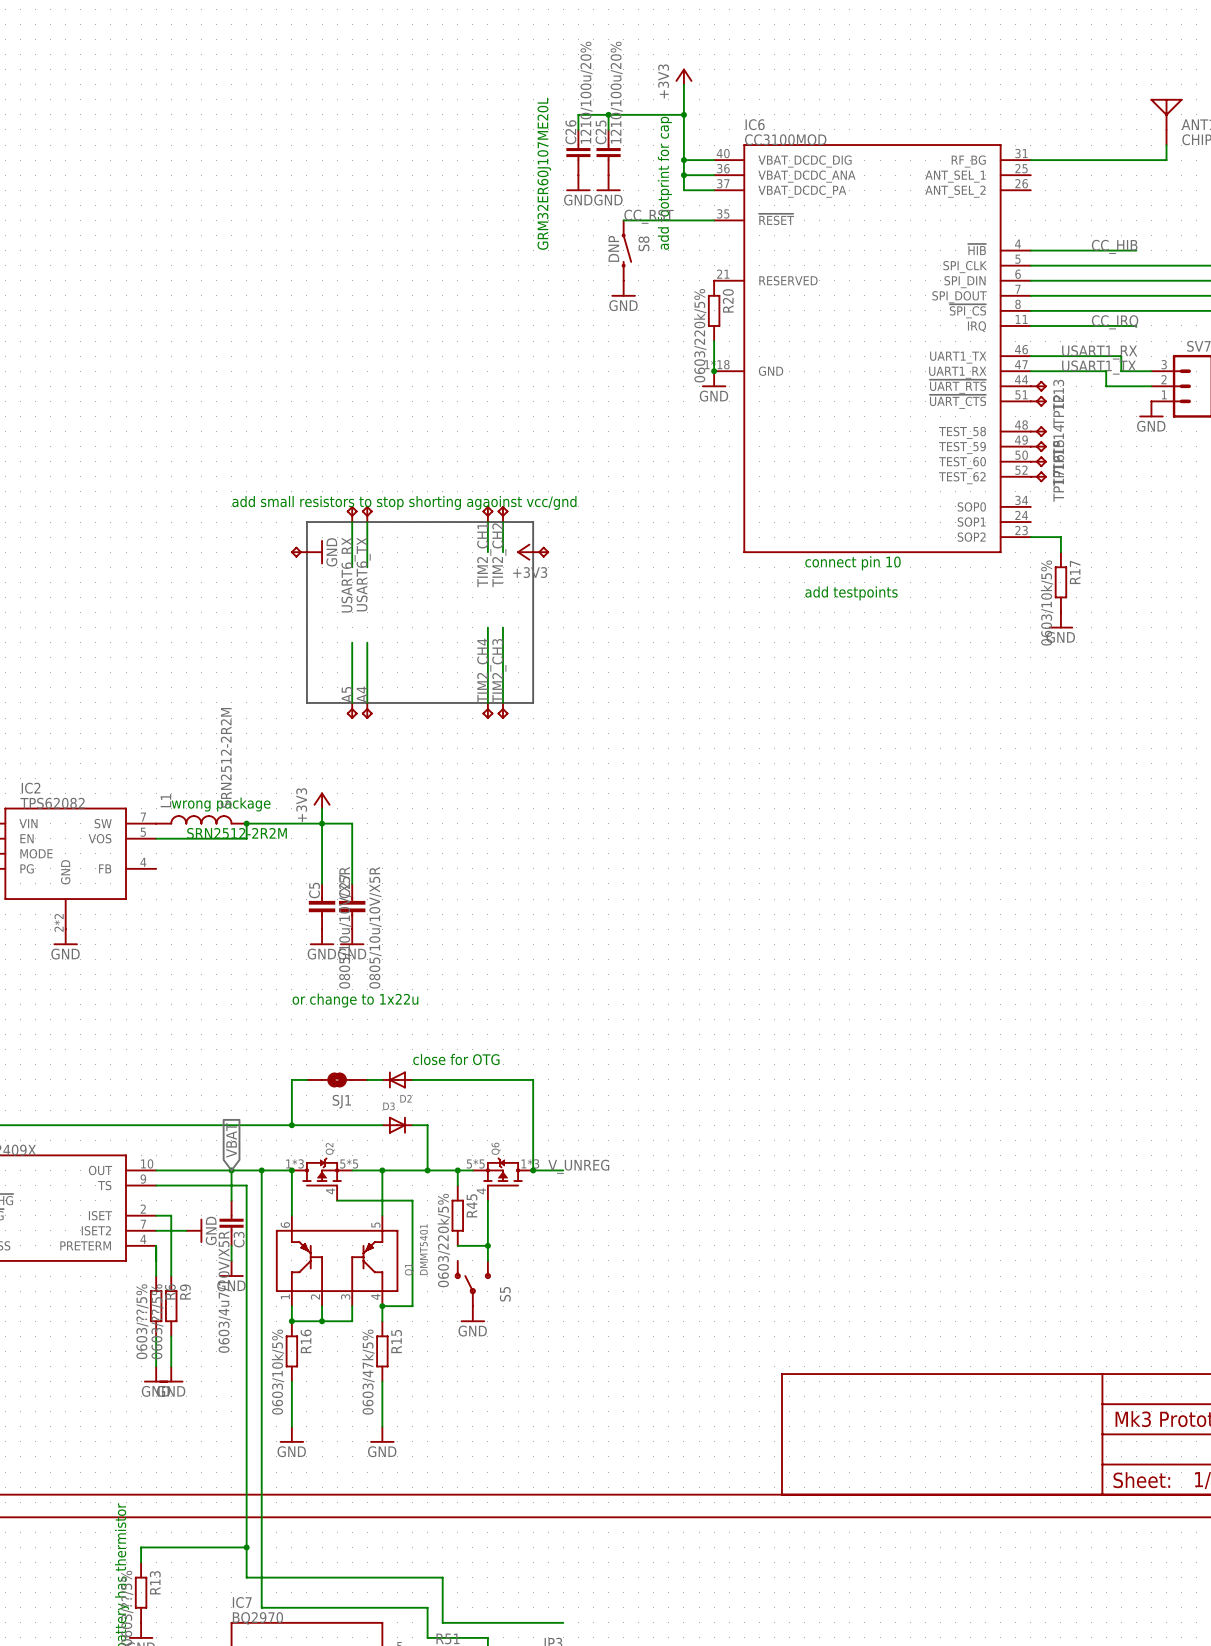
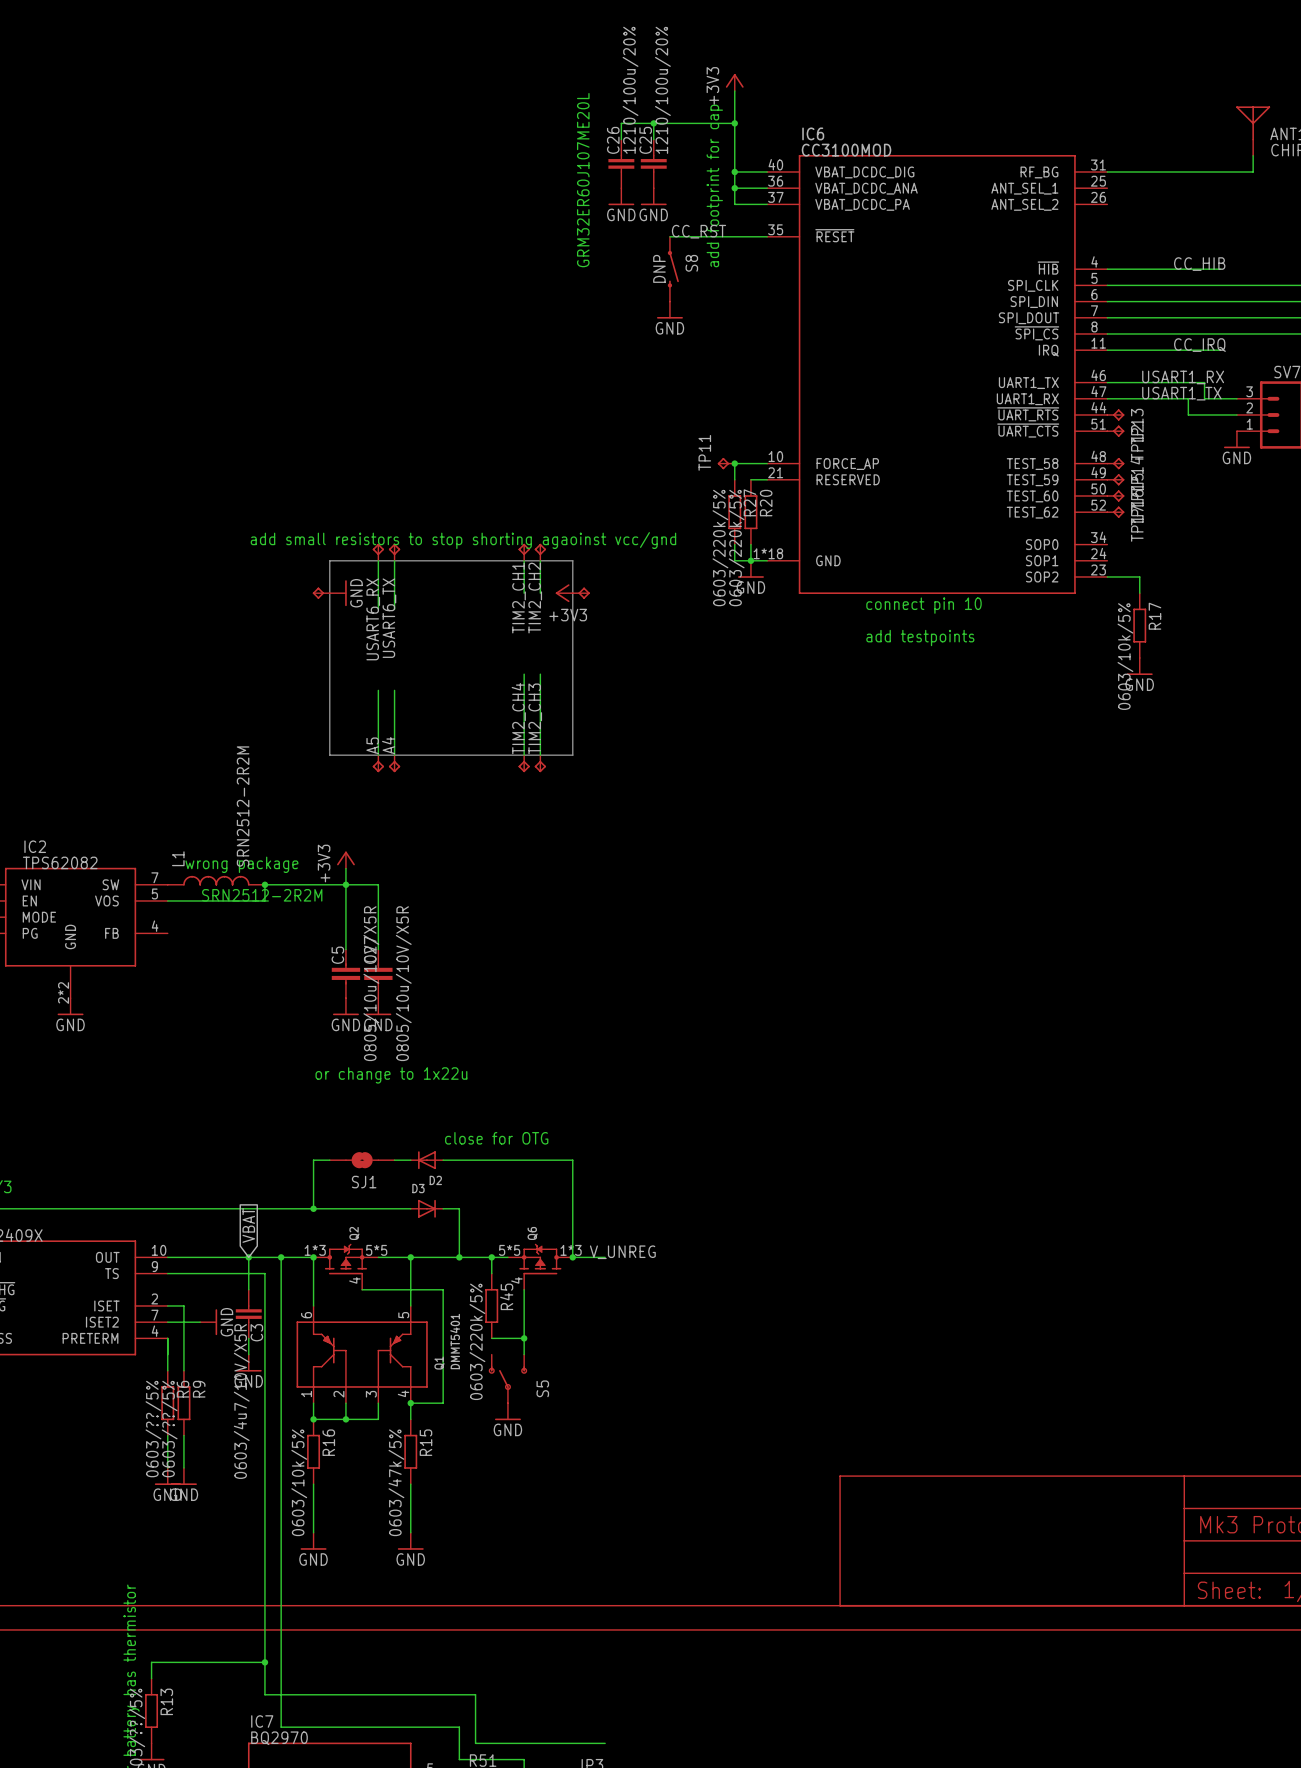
IC6 symbol: [714, 144, 1031, 553] -> [767, 154, 1108, 595]
R20 position: (714, 310) -> (750, 512)
wire: (714, 341) (714, 371) -> none
junction: (714, 371) -> none
power symbol: GND (714, 379) -> none
TP11: none -> (726, 463)
junction: none -> (734, 463)
wire: none -> (767, 463) (734, 463) (734, 479)
wire: none -> (750, 479) (767, 479)
R27: none -> 0603/220k/5% (734, 512)
wire: none -> (734, 544) (734, 560) (767, 560)
wire: none -> (750, 544) (750, 560)
junction: none -> (750, 560)
power symbol: none -> GND (750, 569)

